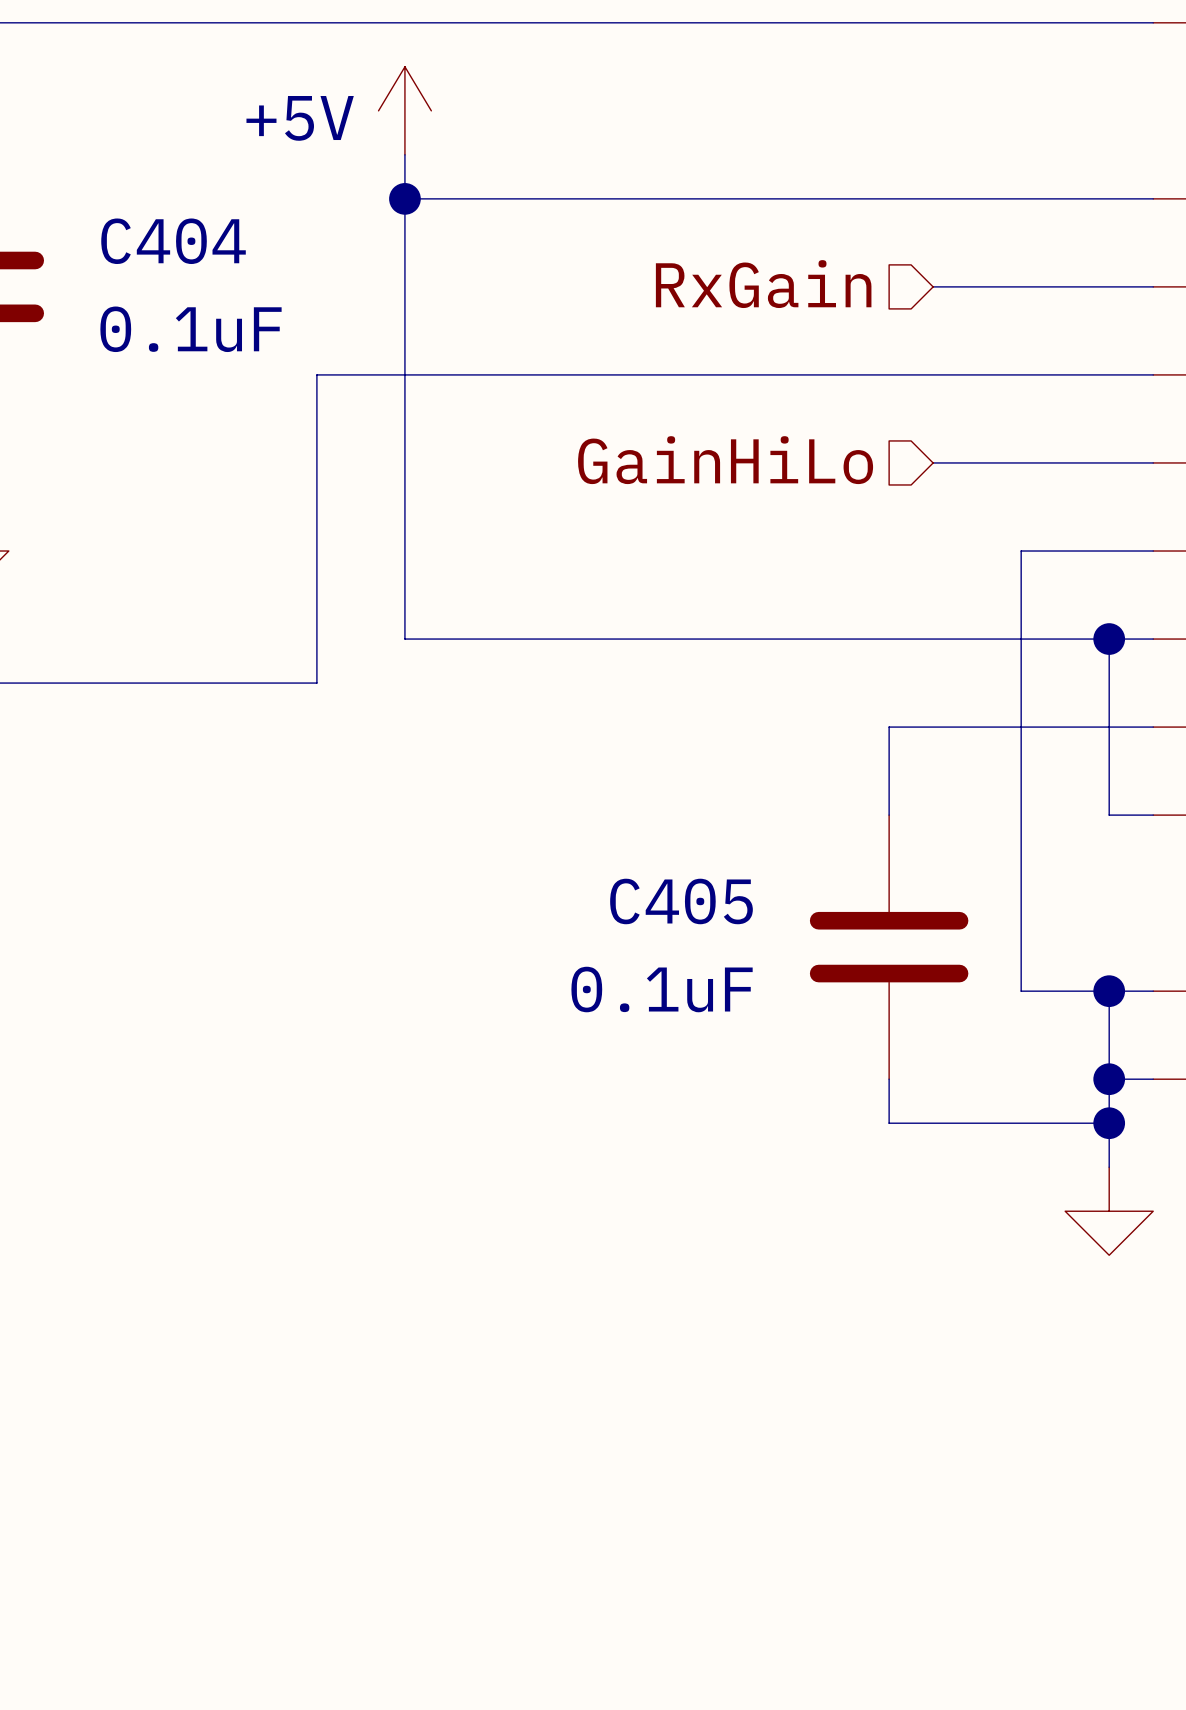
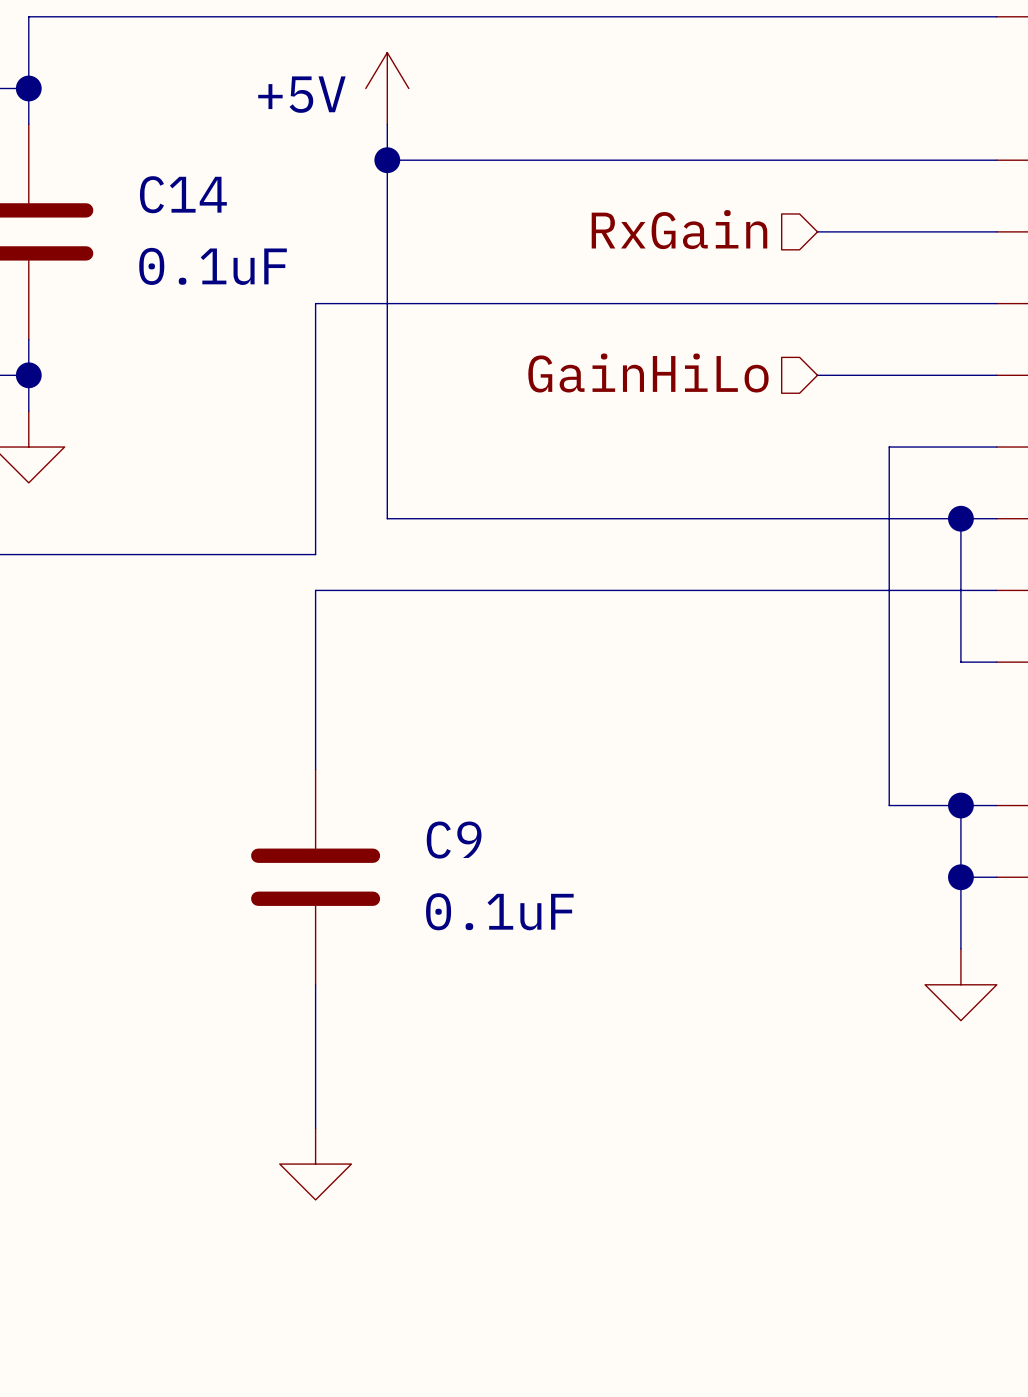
C404 name: C404 (173, 241) -> C14 (183, 194)
wire: (889, 727) (889, 815) -> (781, 590) (315, 590) (315, 769)
C405: 0.1uF (889, 947) -> none
C9: none -> 0.1uF (315, 877)
wire: (889, 1079) (889, 1123) (1109, 1123) -> none
junction: (1109, 1123) -> none
wire: none -> (315, 984) (315, 1128)
power symbol: none -> (315, 1164)

